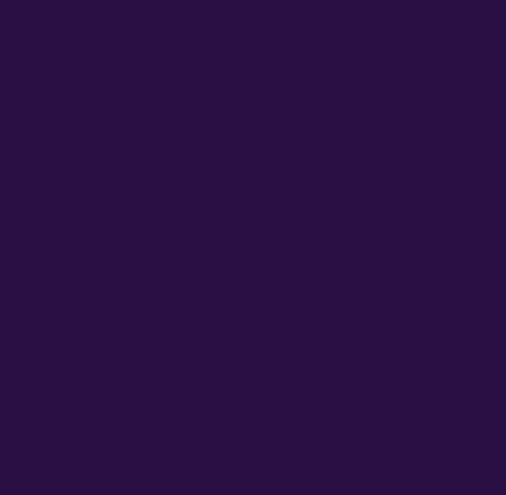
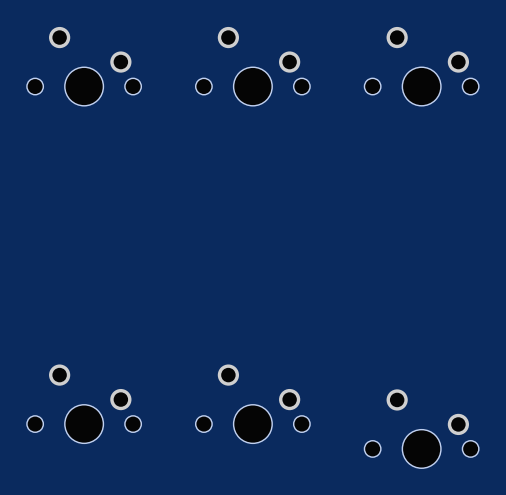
part: none -> (84, 66)
part: none -> (252, 66)
part: none -> (421, 66)
part: none -> (84, 403)
part: none -> (252, 403)
part: none -> (421, 428)

